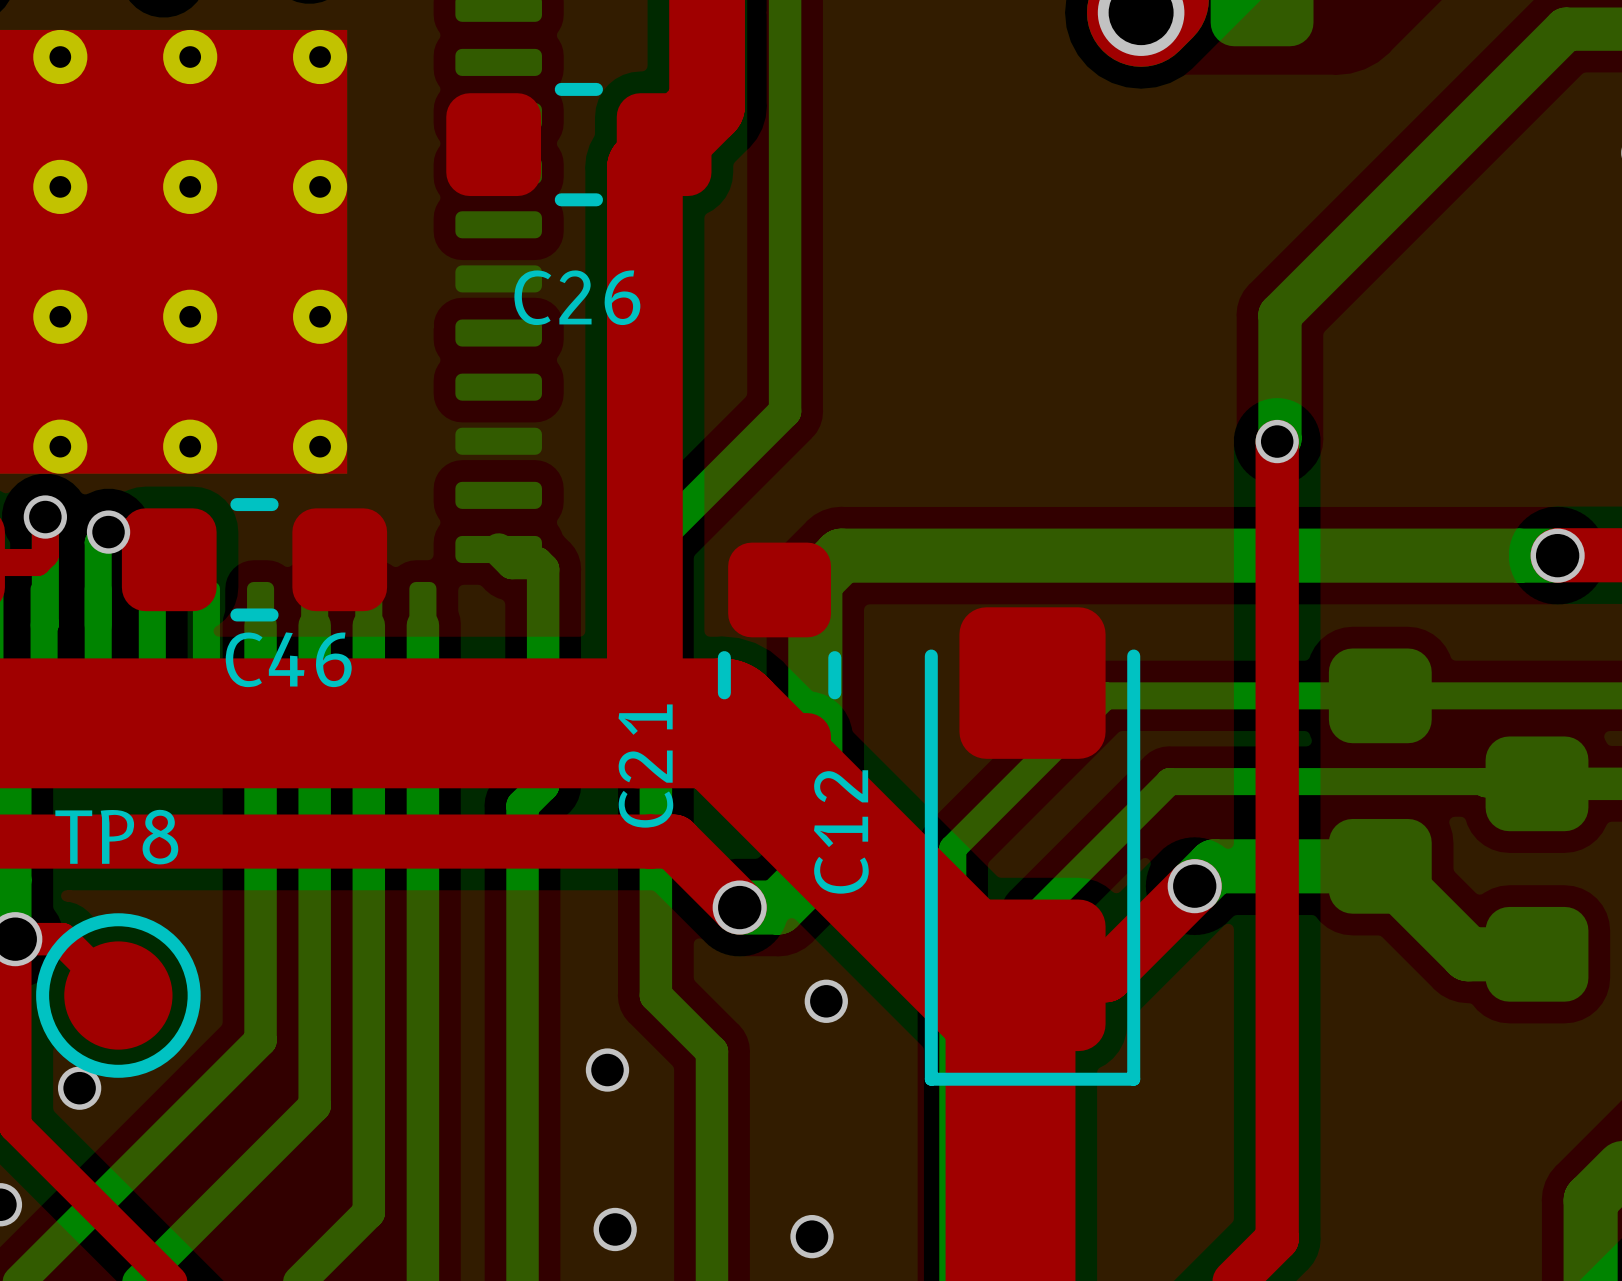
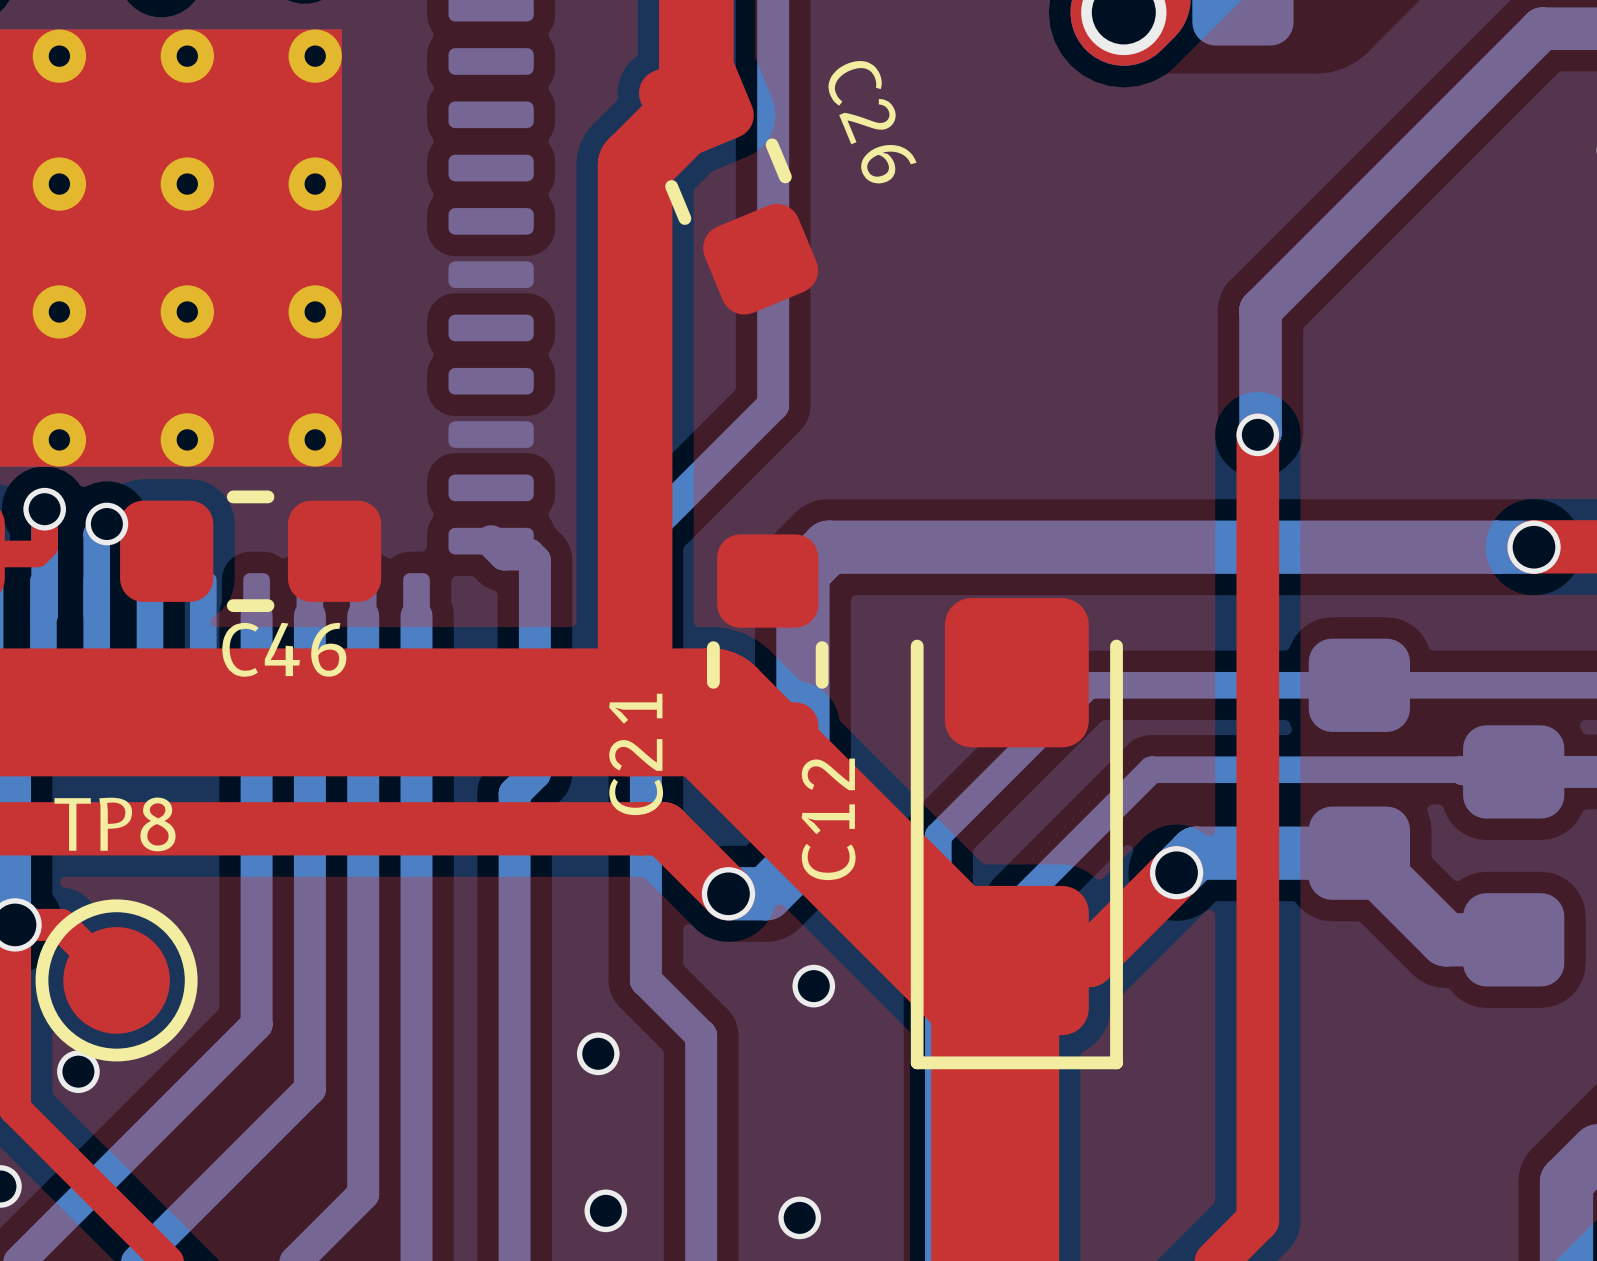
C26 rotation: 0° (578, 144) -> 67.5° clockwise (728, 181)
C26 position: (578, 144) -> (728, 181)
C26 name position: C26 (577, 297) -> C26 (872, 122)

